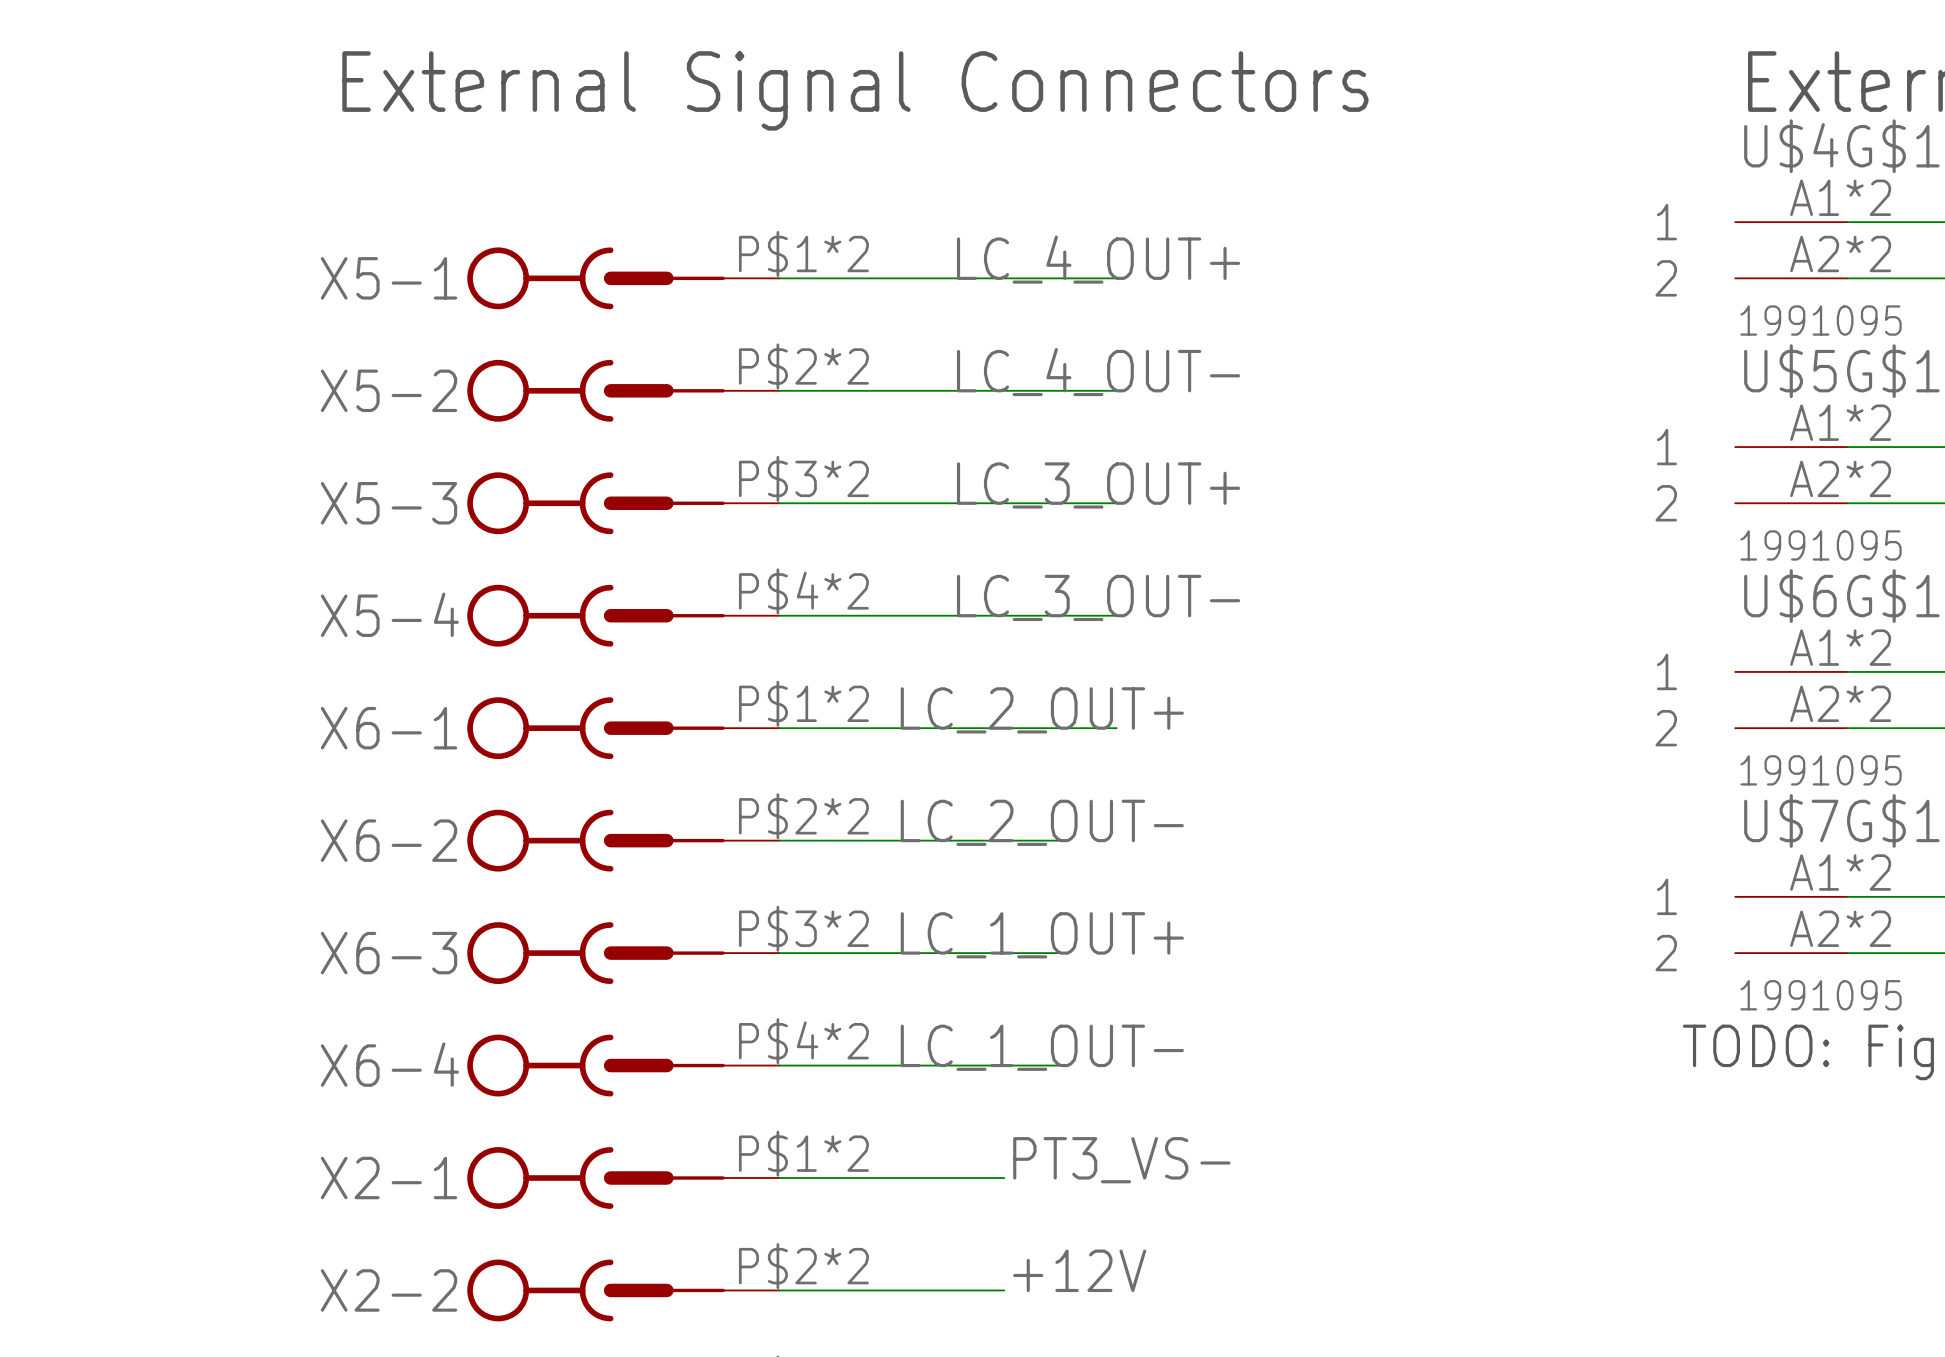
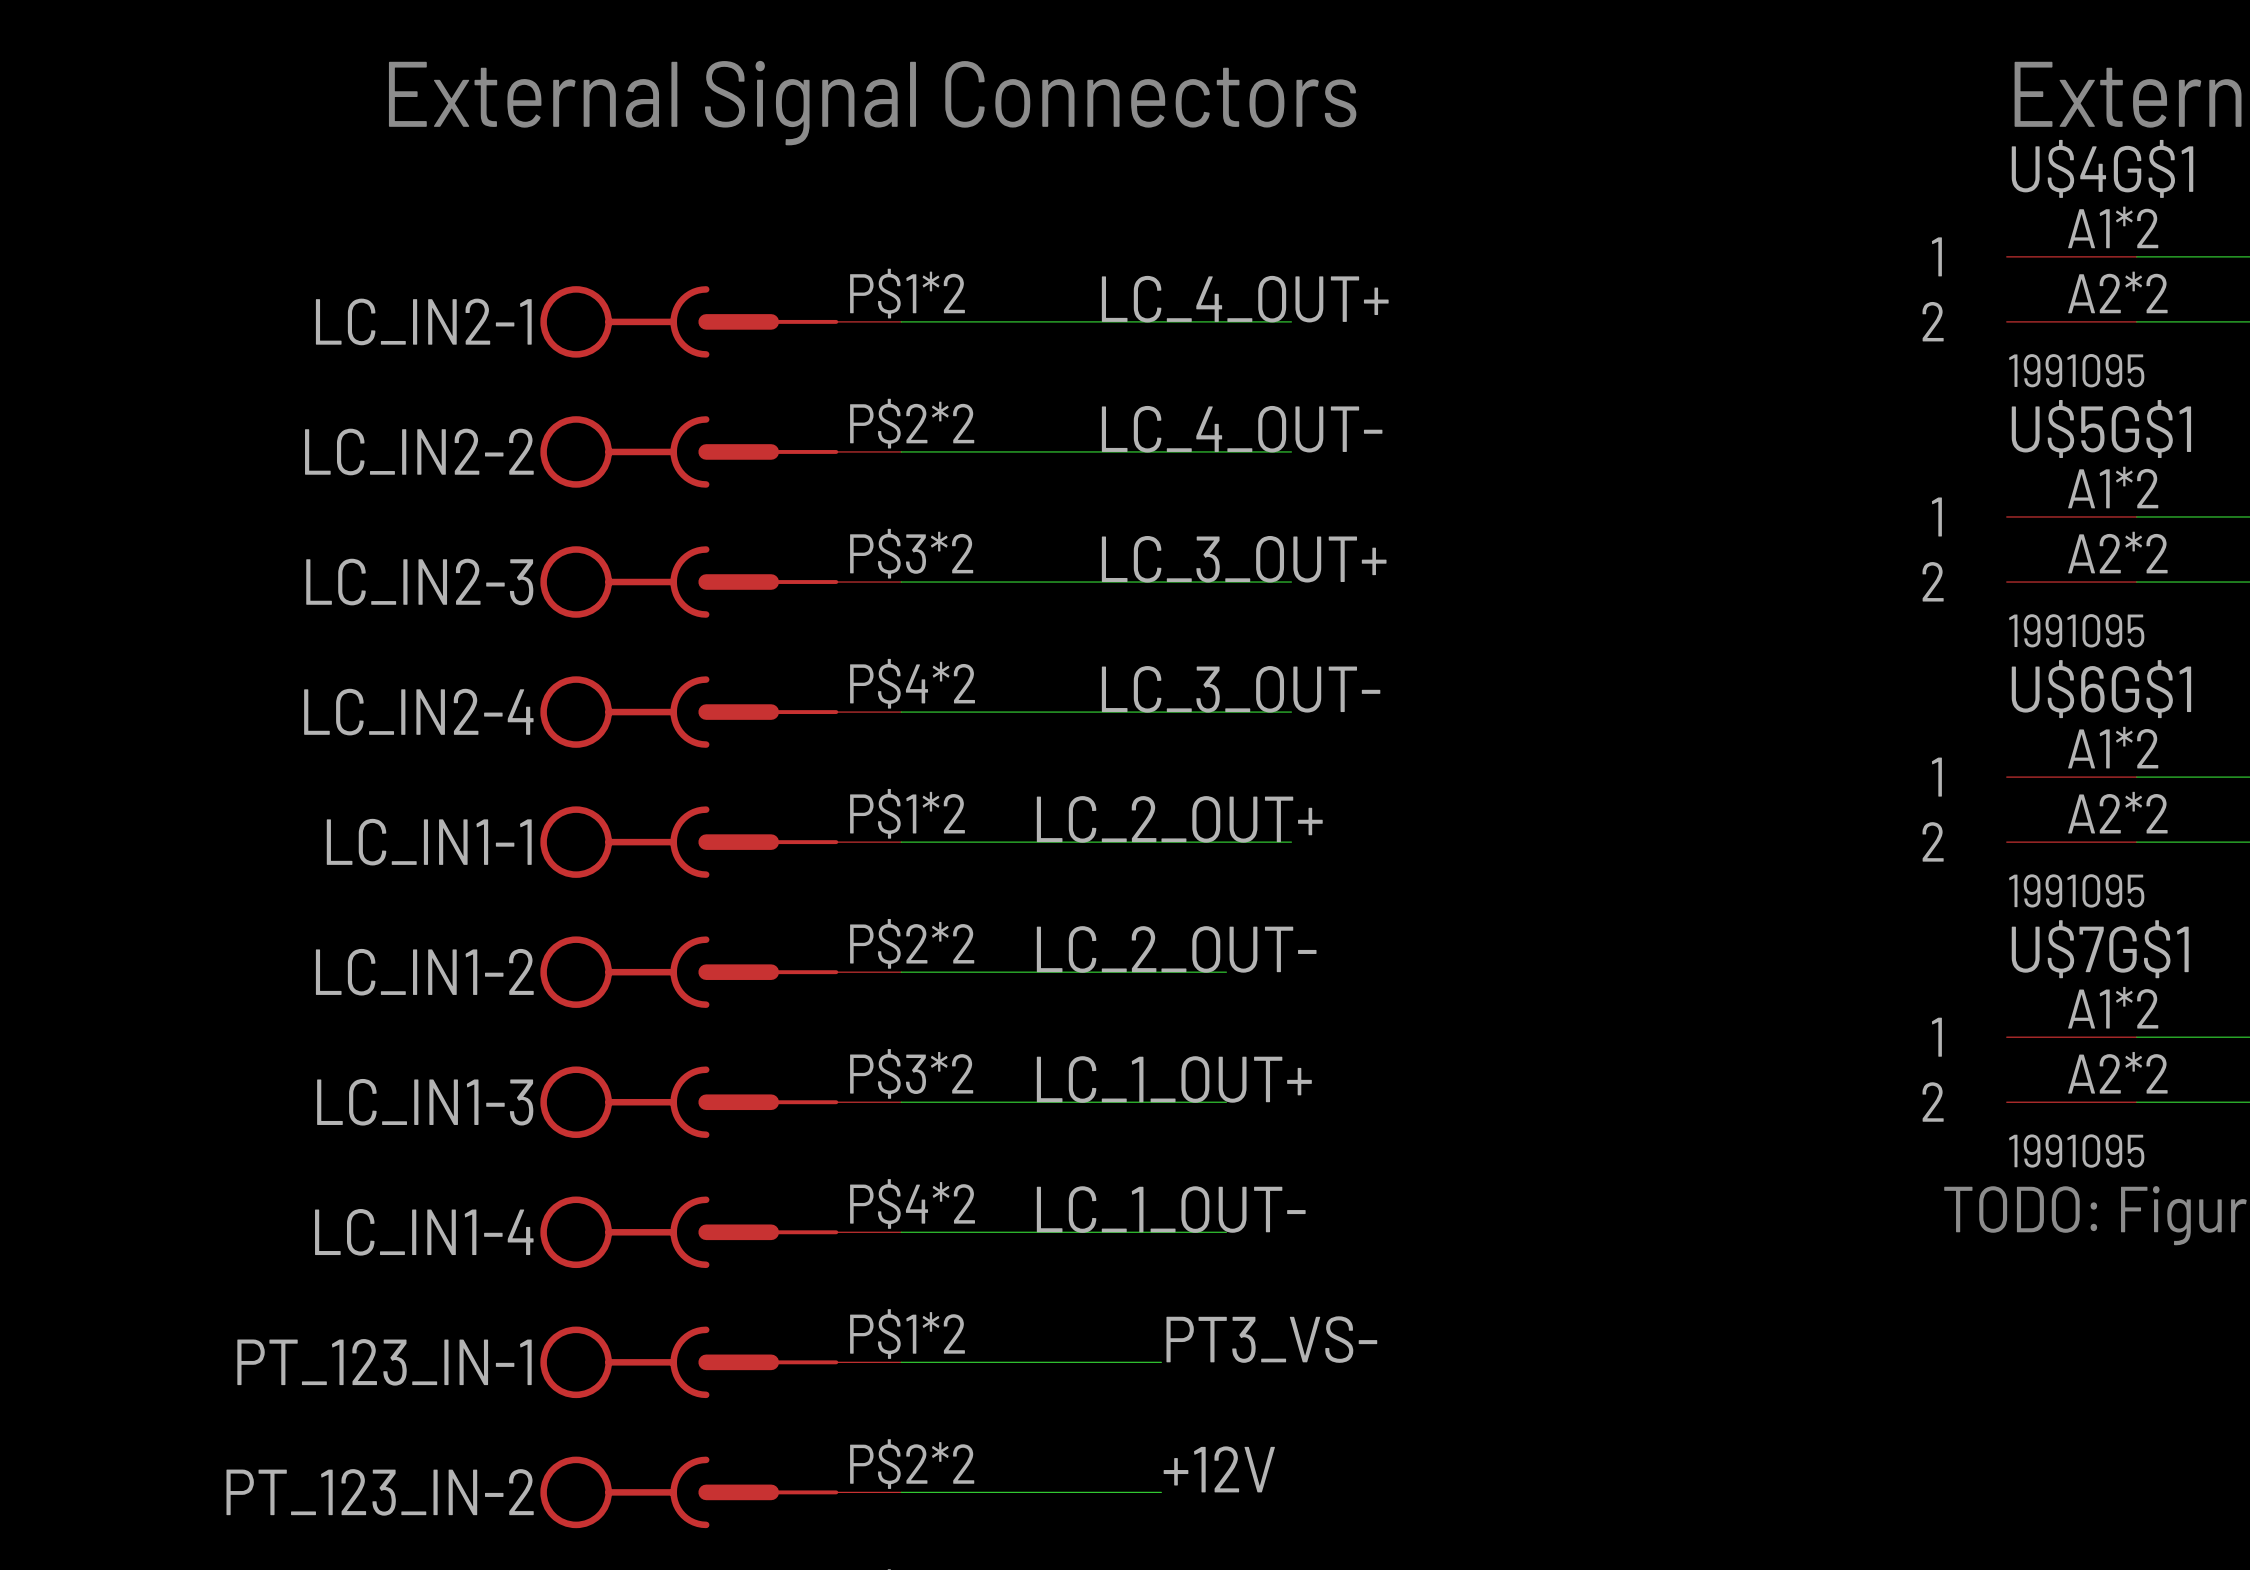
X5-1 name: X5-1 (389, 278) -> LC_IN2-1 (423, 321)
X5-2 name: X5-2 (389, 390) -> LC_IN2-2 (419, 451)
X5-3 name: X5-3 (389, 503) -> LC_IN2-3 (419, 582)
X5-4 name: X5-4 (389, 614) -> LC_IN2-4 (418, 712)
X6-1 name: X6-1 (389, 728) -> LC_IN1-1 (429, 842)
X6-2 name: X6-2 (389, 840) -> LC_IN1-2 (424, 972)
X6-3 name: X6-3 (389, 953) -> LC_IN1-3 (425, 1102)
X6-4 name: X6-4 (389, 1064) -> LC_IN1-4 (424, 1232)
X2-1 name: X2-1 (389, 1178) -> PT_123_IN-1 (384, 1362)
X2-2 name: X2-2 (389, 1290) -> PT_123_IN-2 (380, 1492)

